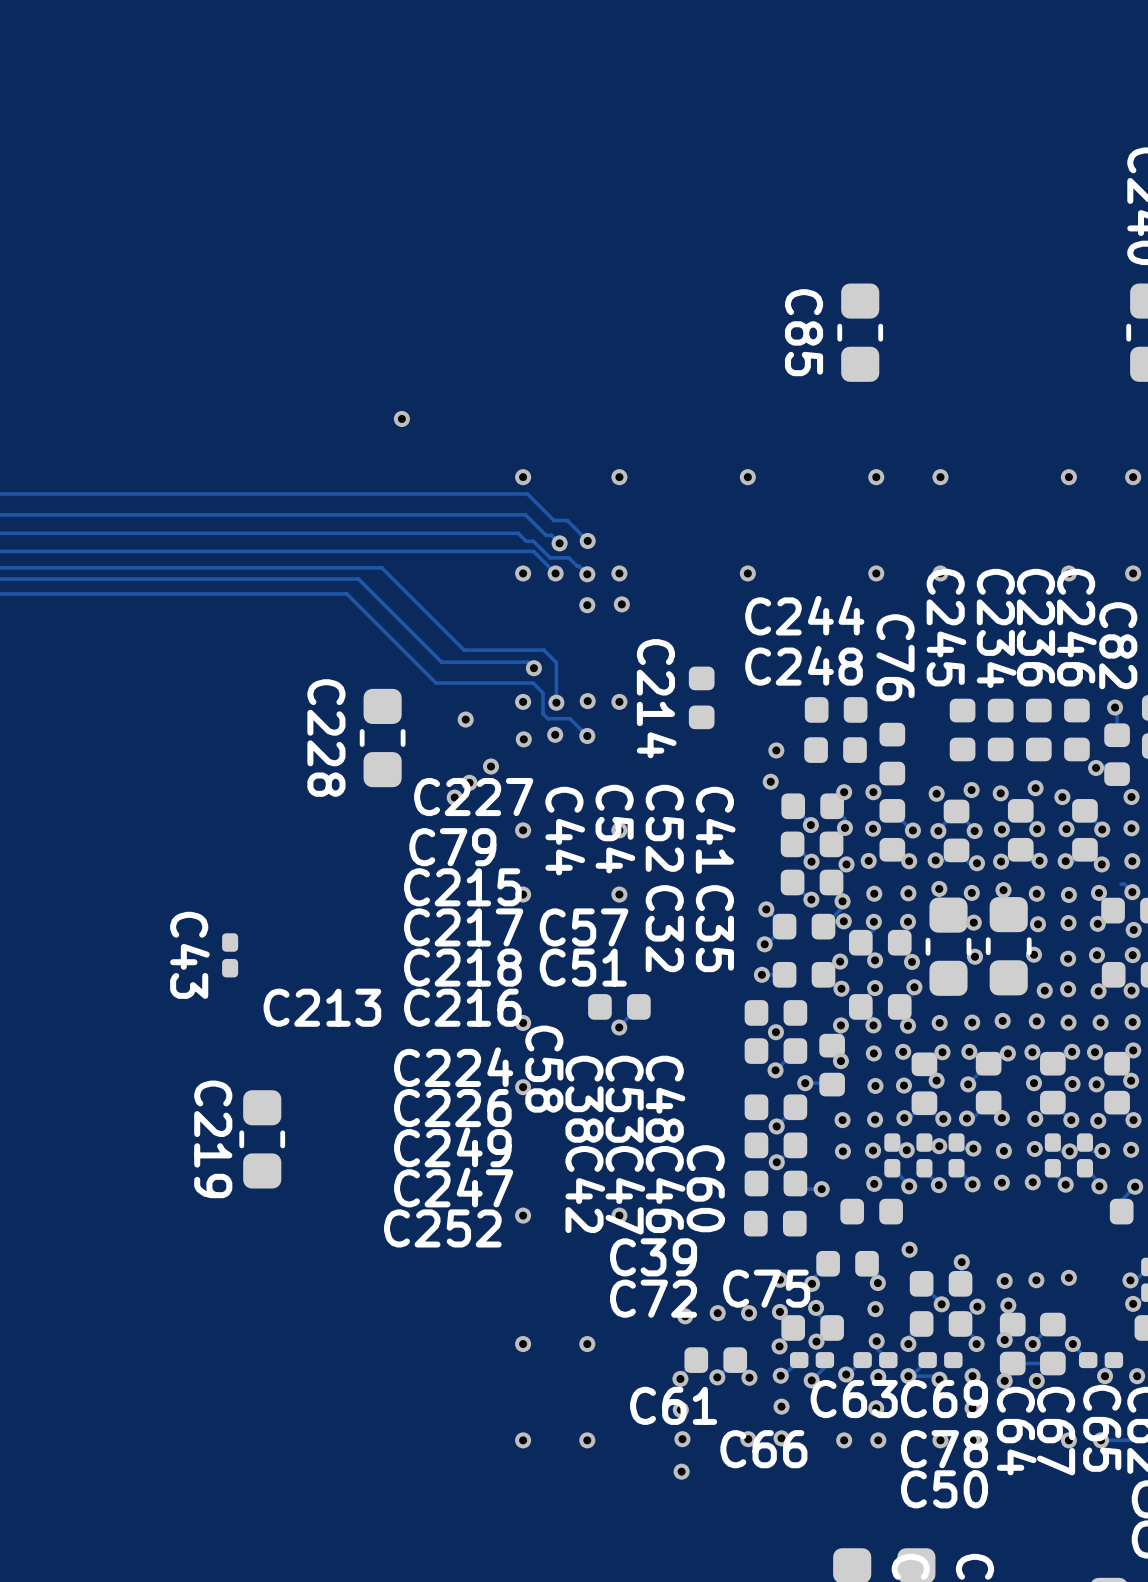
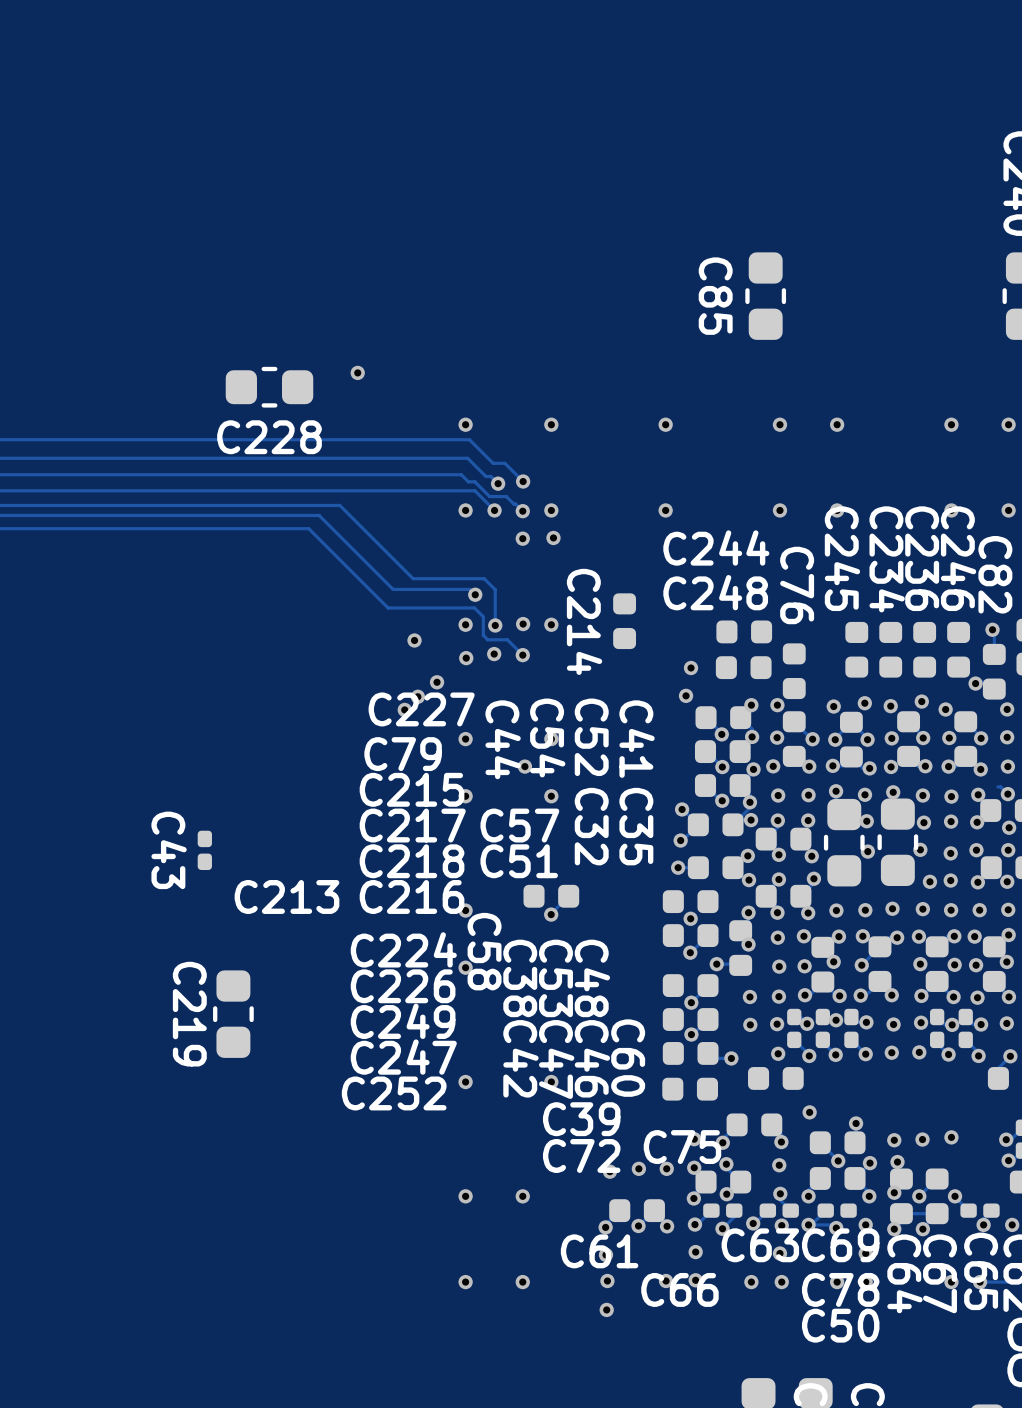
C228 name position: C228 (326, 738) -> C228 (269, 437)
C228 rotation: 0° (382, 738) -> 90° clockwise (269, 387)
C228 position: (382, 738) -> (269, 387)
via: none -> (524, 766)

